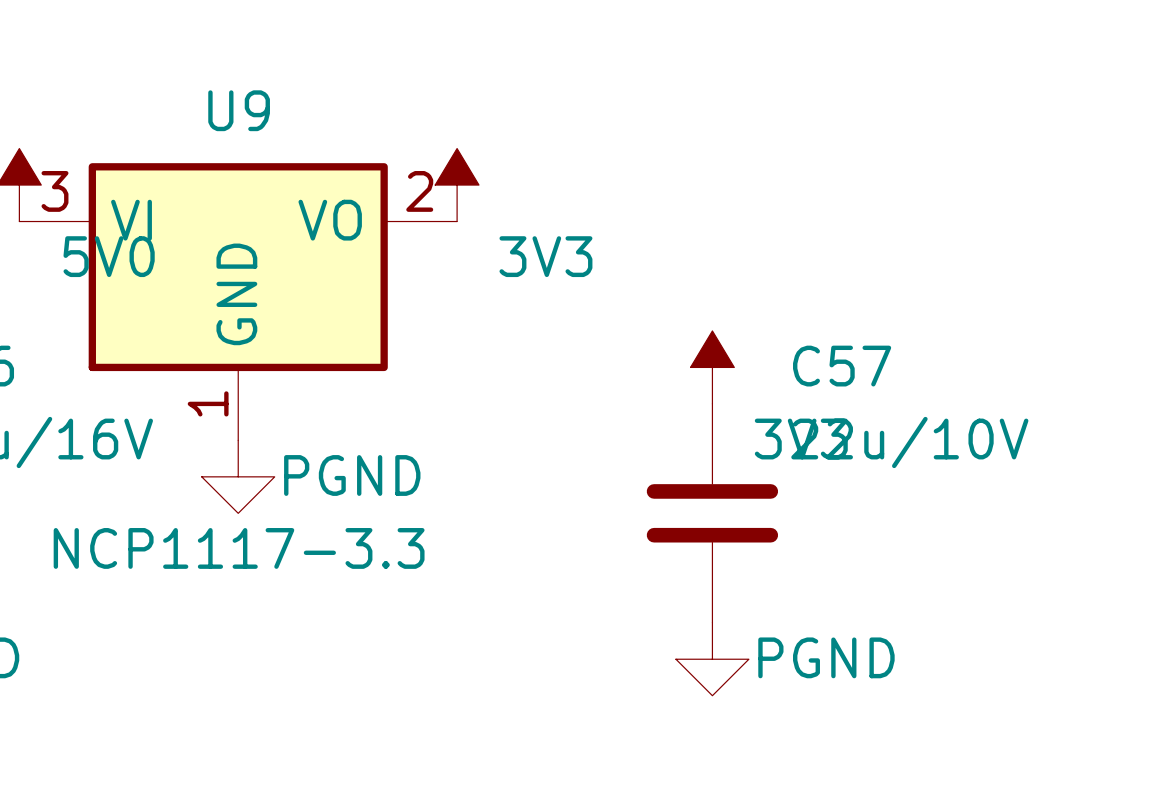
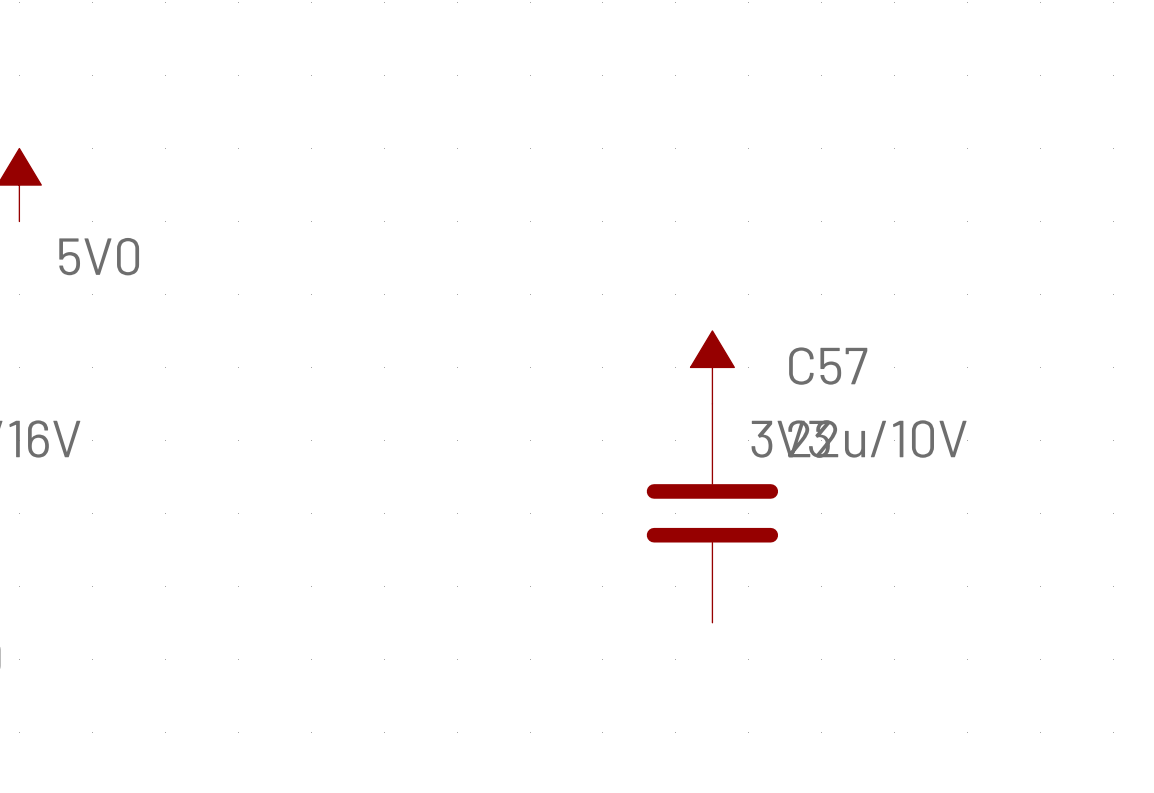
power symbol: 3V3 (457, 185) -> none
U9: NCP1117-3.3 (238, 301) -> none
power symbol: PGND (238, 476) -> none
power symbol: PGND (712, 659) -> none

